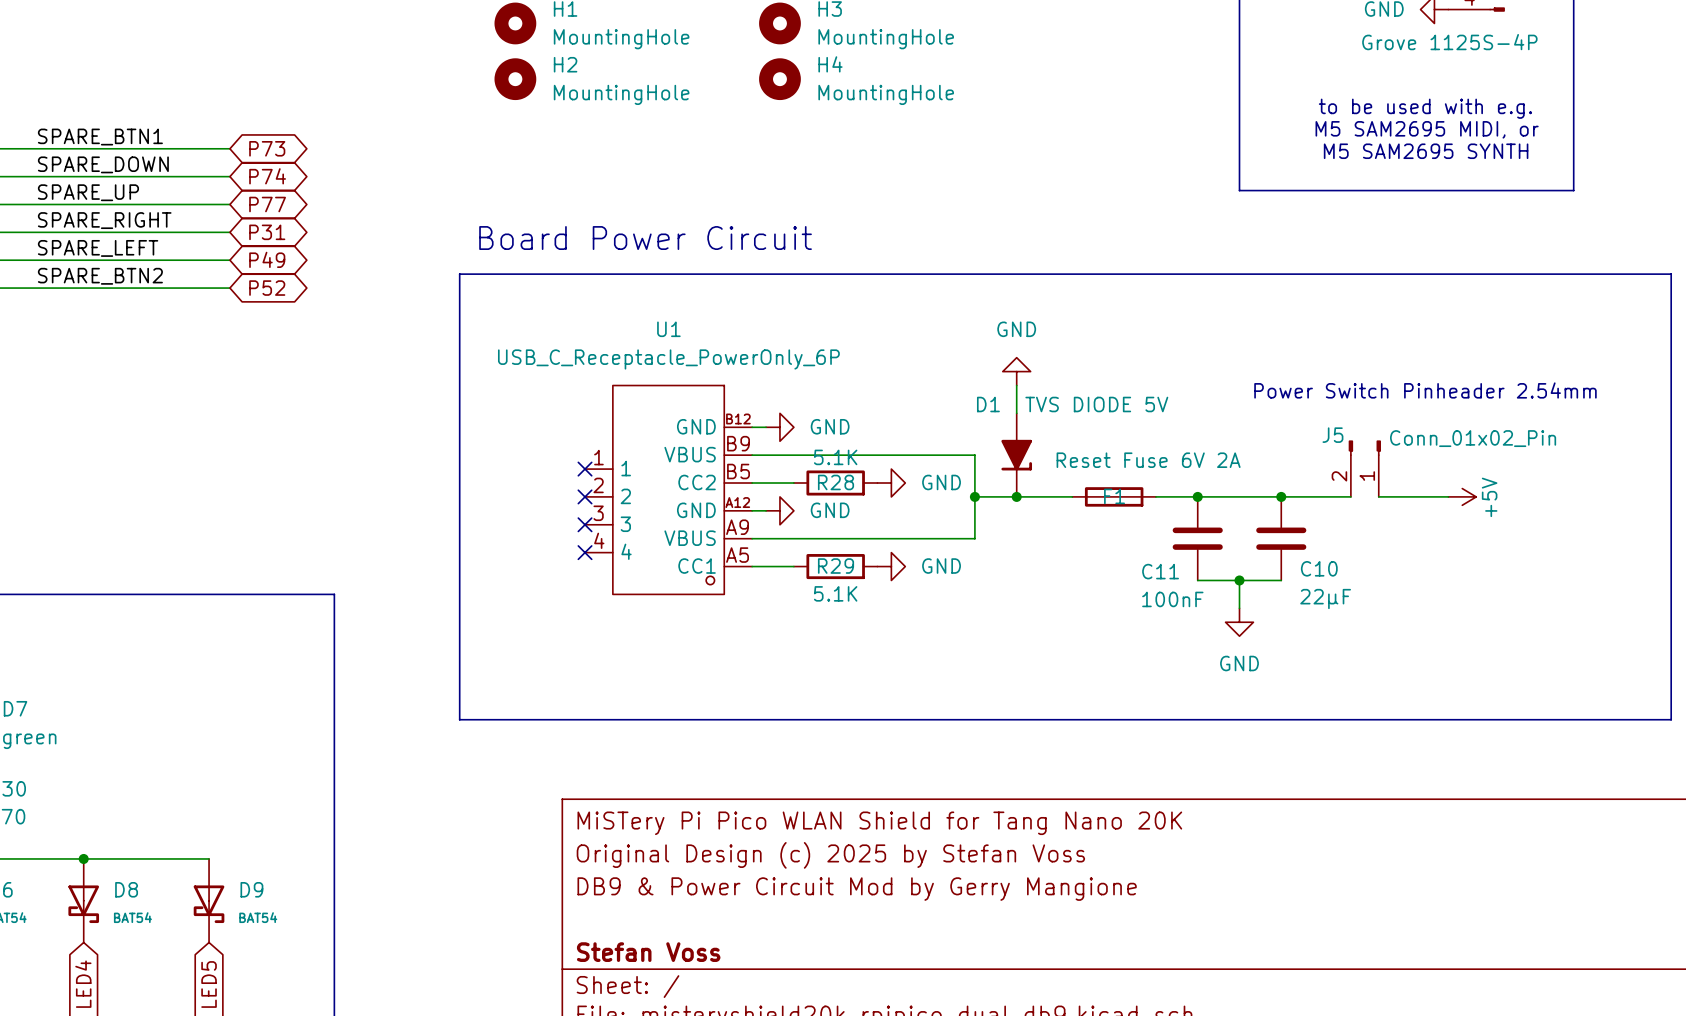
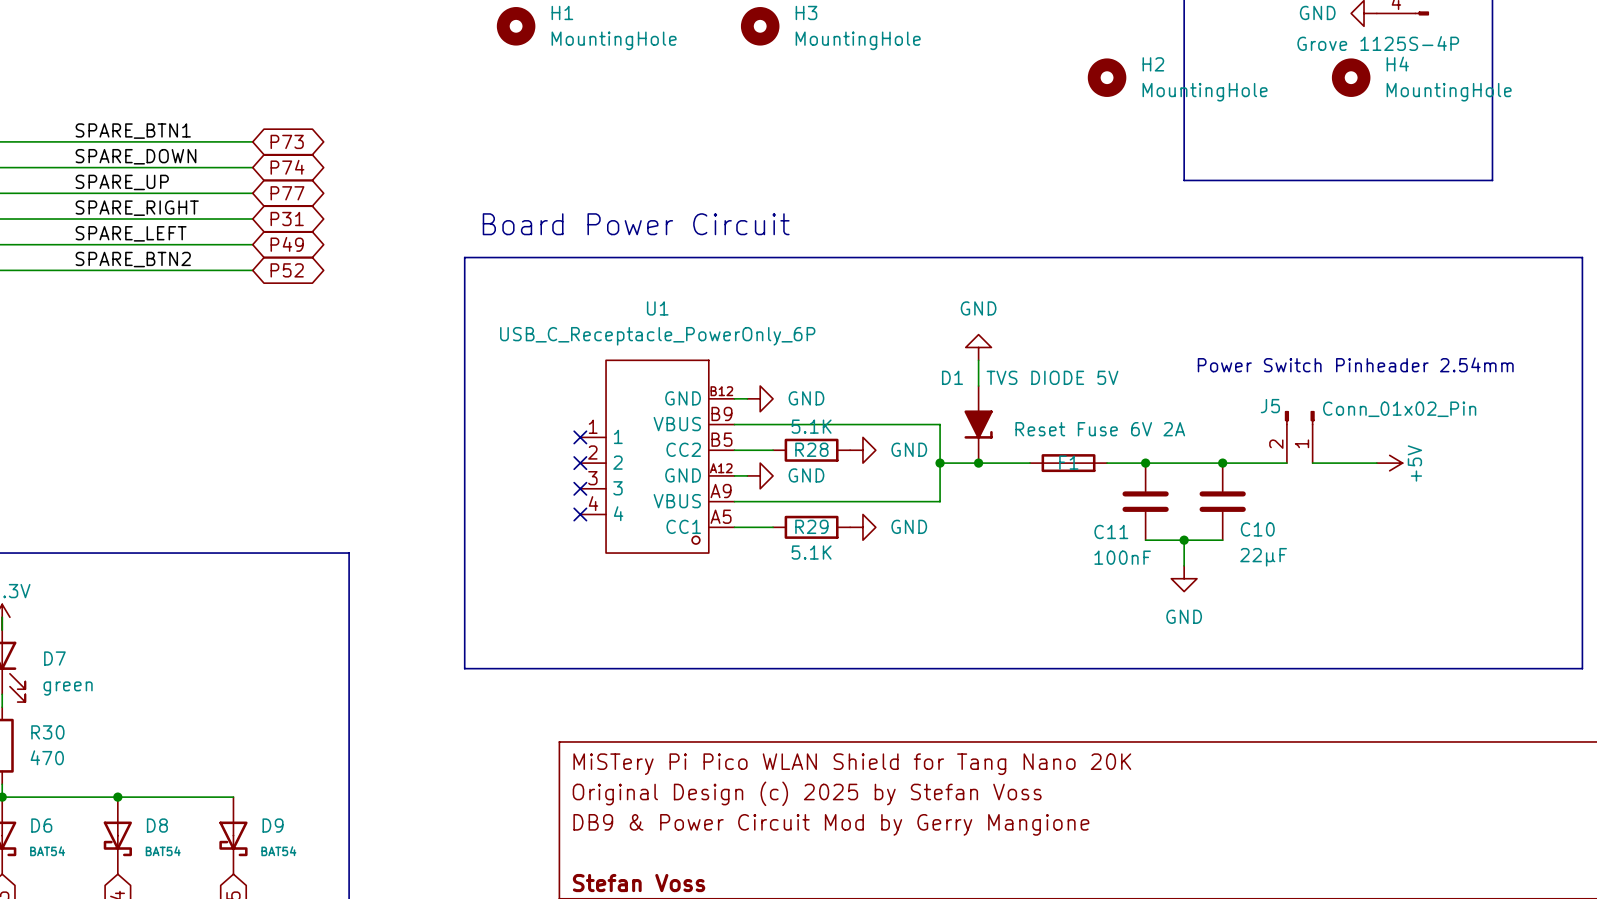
H2 position: (515, 79) -> (1107, 77)
H4 position: (779, 79) -> (1351, 77)
text: to be used with e.g. (1425, 108) -> none
text: M5 SAM2695 MIDI, or (1427, 129) -> none
text: M5 SAM2695 SYNTH (1426, 151) -> none

